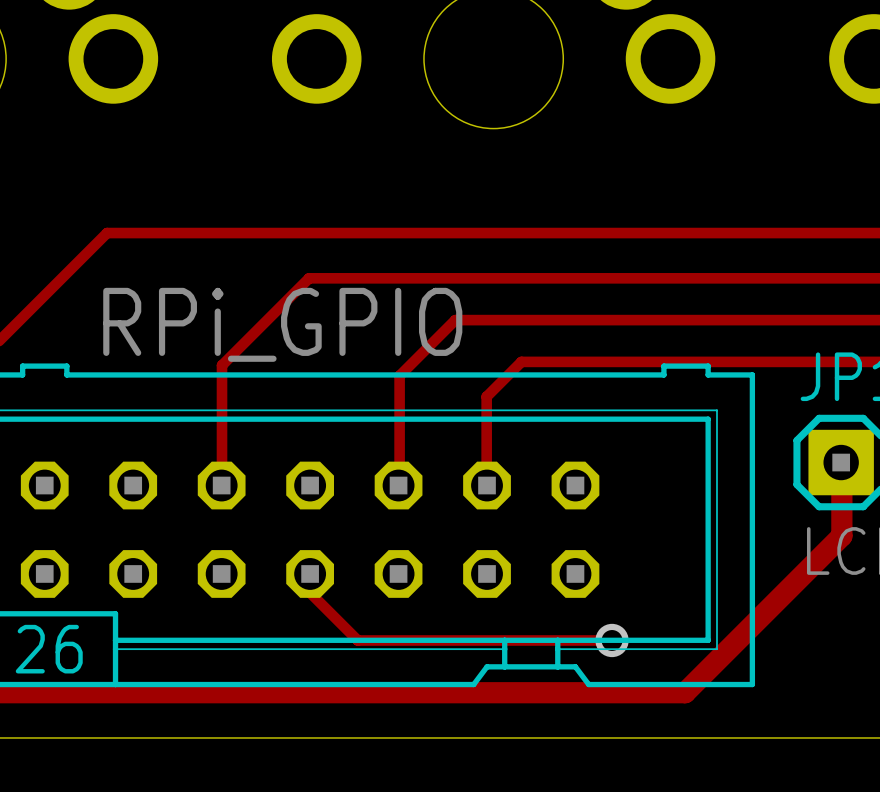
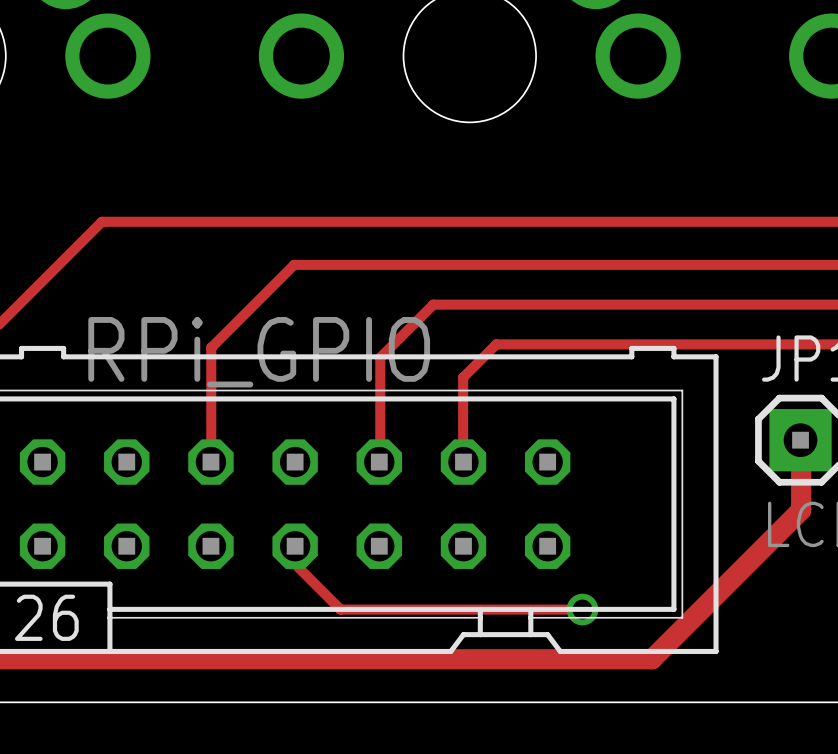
part value position: RPi_GPIO (282, 324) -> RPi_GPIO (259, 352)

